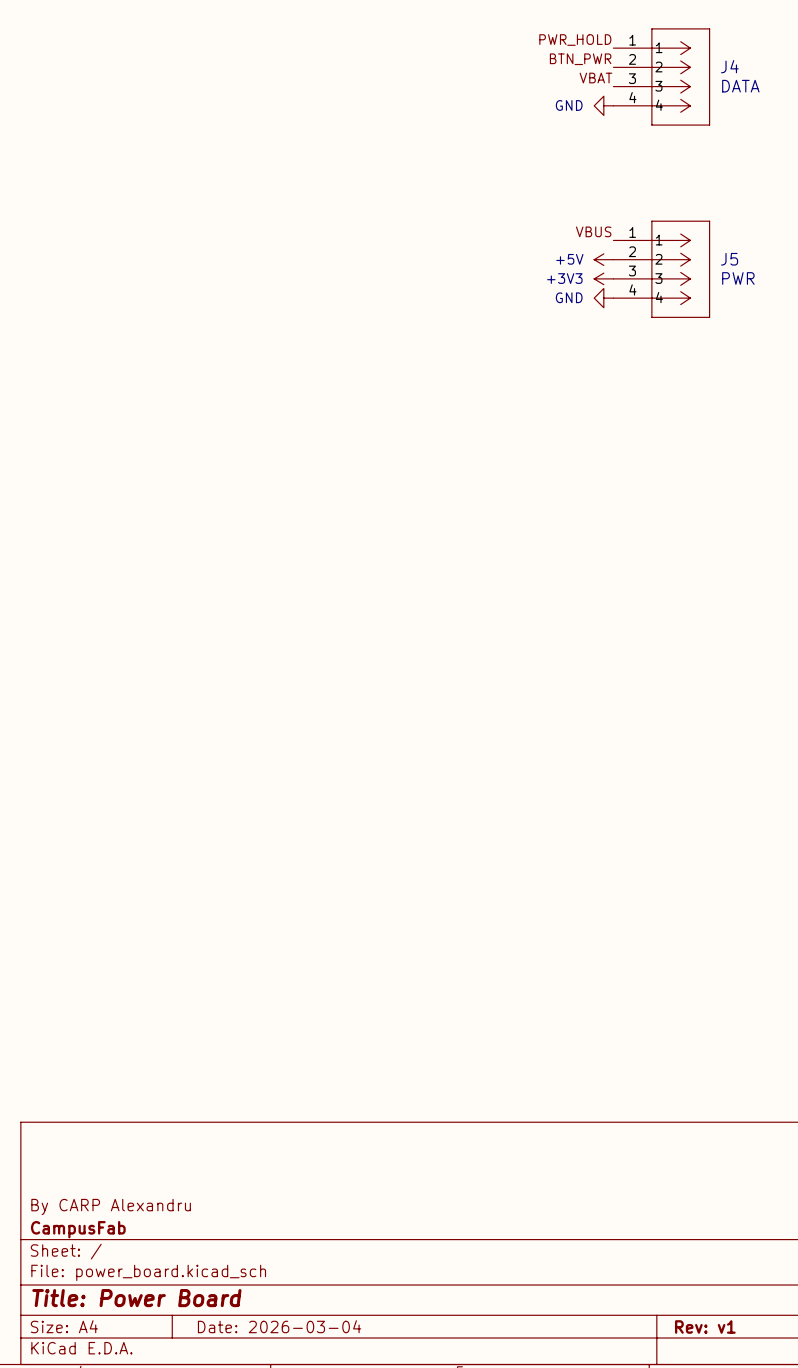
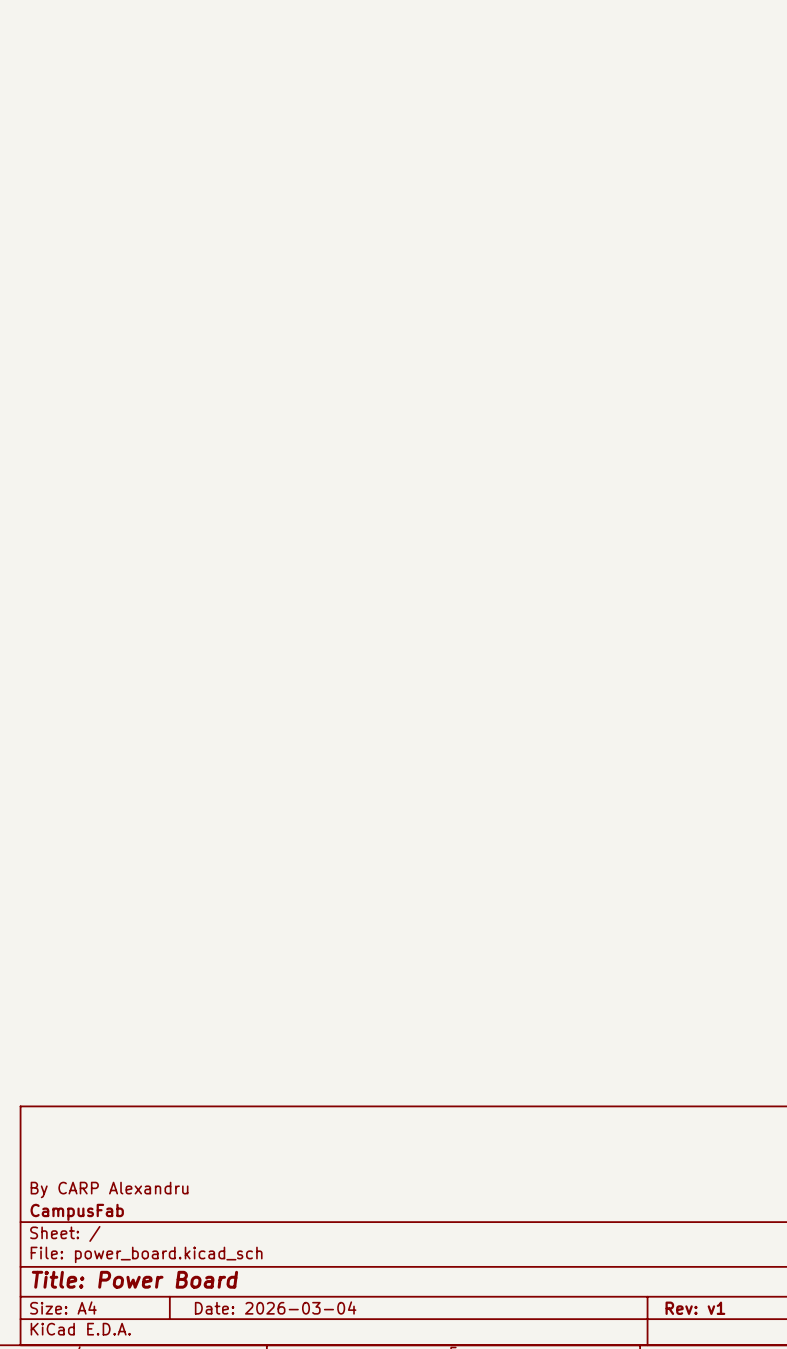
label: PWR_HOLD (575, 40) -> none
label: BTN_PWR (580, 59) -> none
J4: DATA (661, 76) -> none
label: VBAT (595, 78) -> none
power symbol: GND (603, 105) -> none
label: VBUS (593, 231) -> none
power symbol: +5V (603, 259) -> none
J5: PWR (661, 269) -> none
power symbol: +3V3 (603, 278) -> none
power symbol: GND (603, 298) -> none

